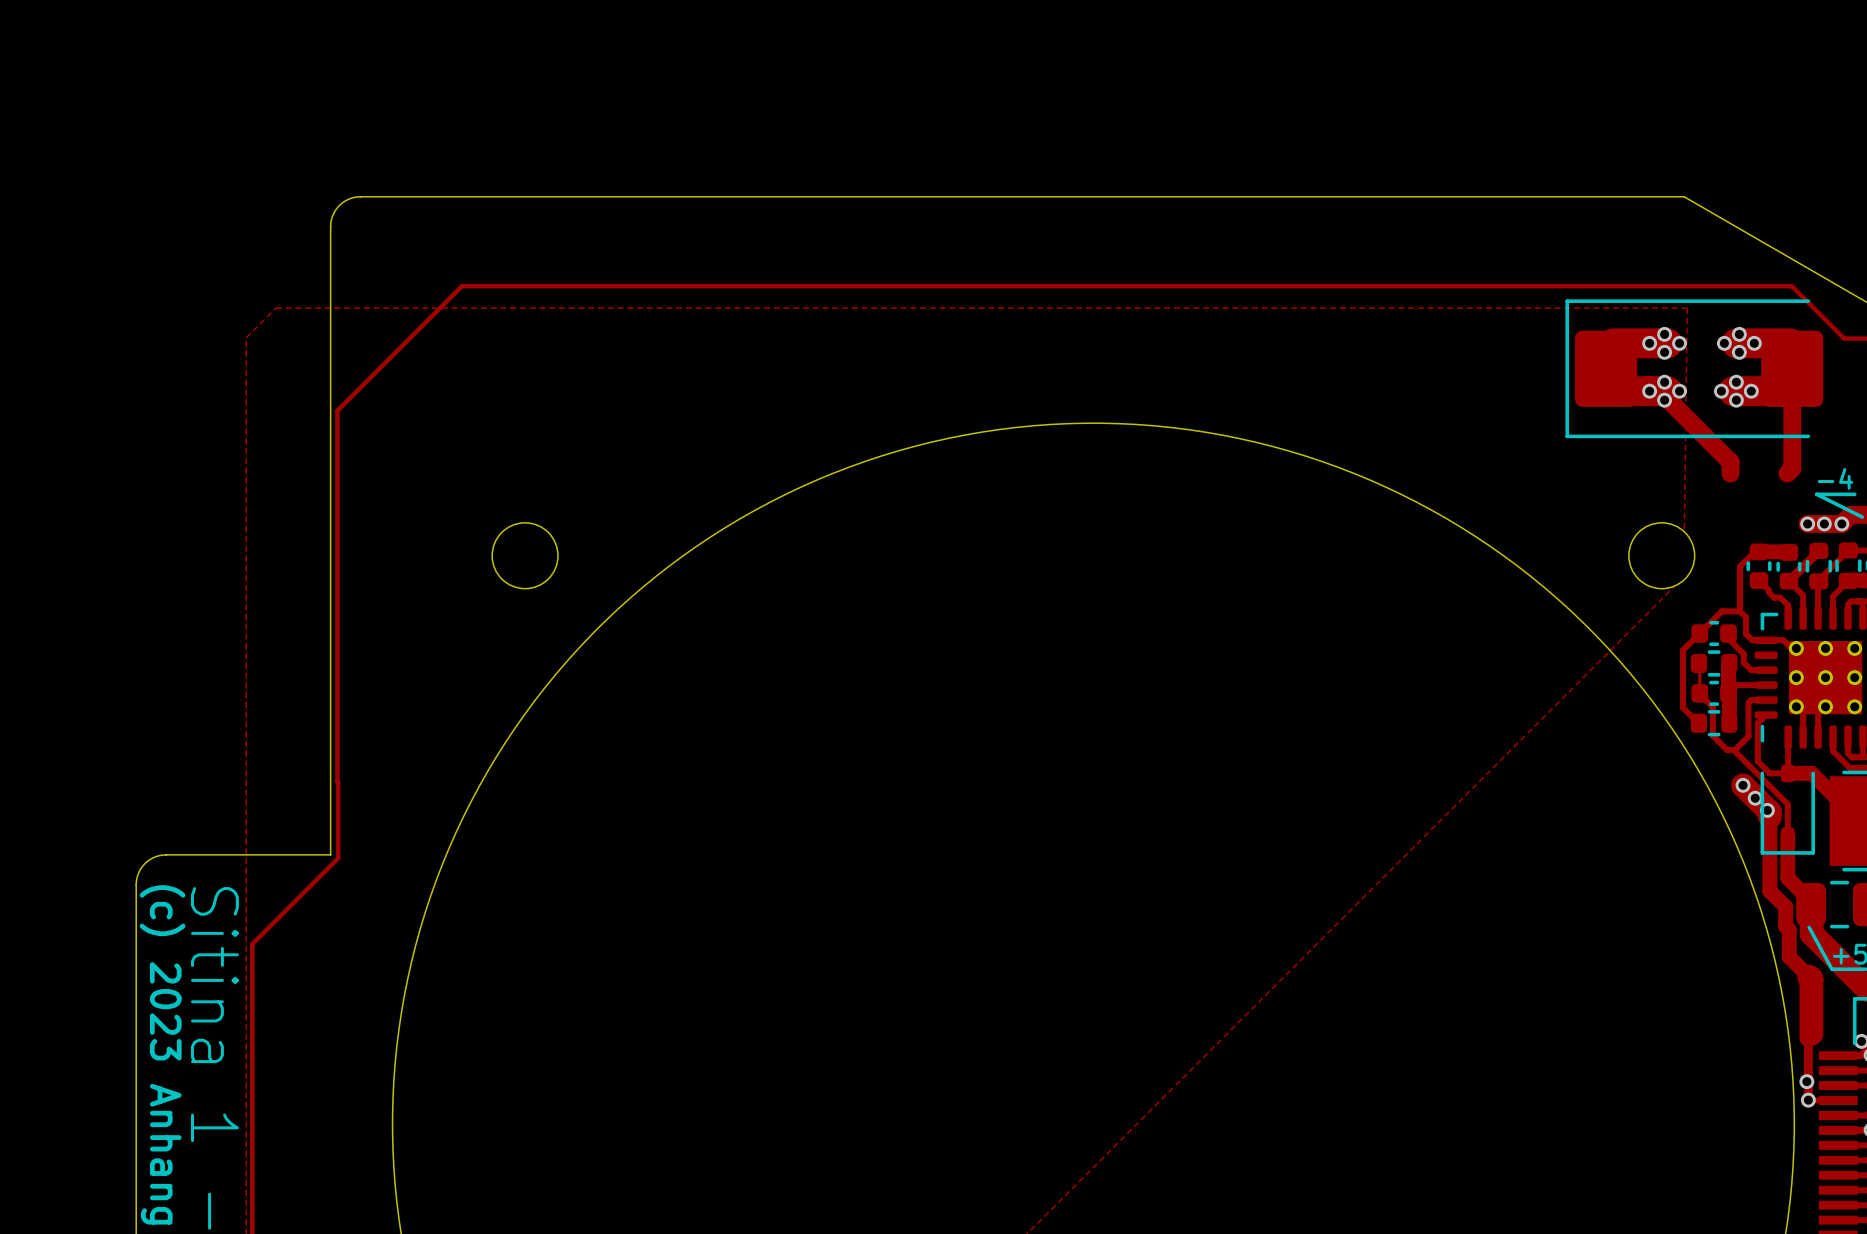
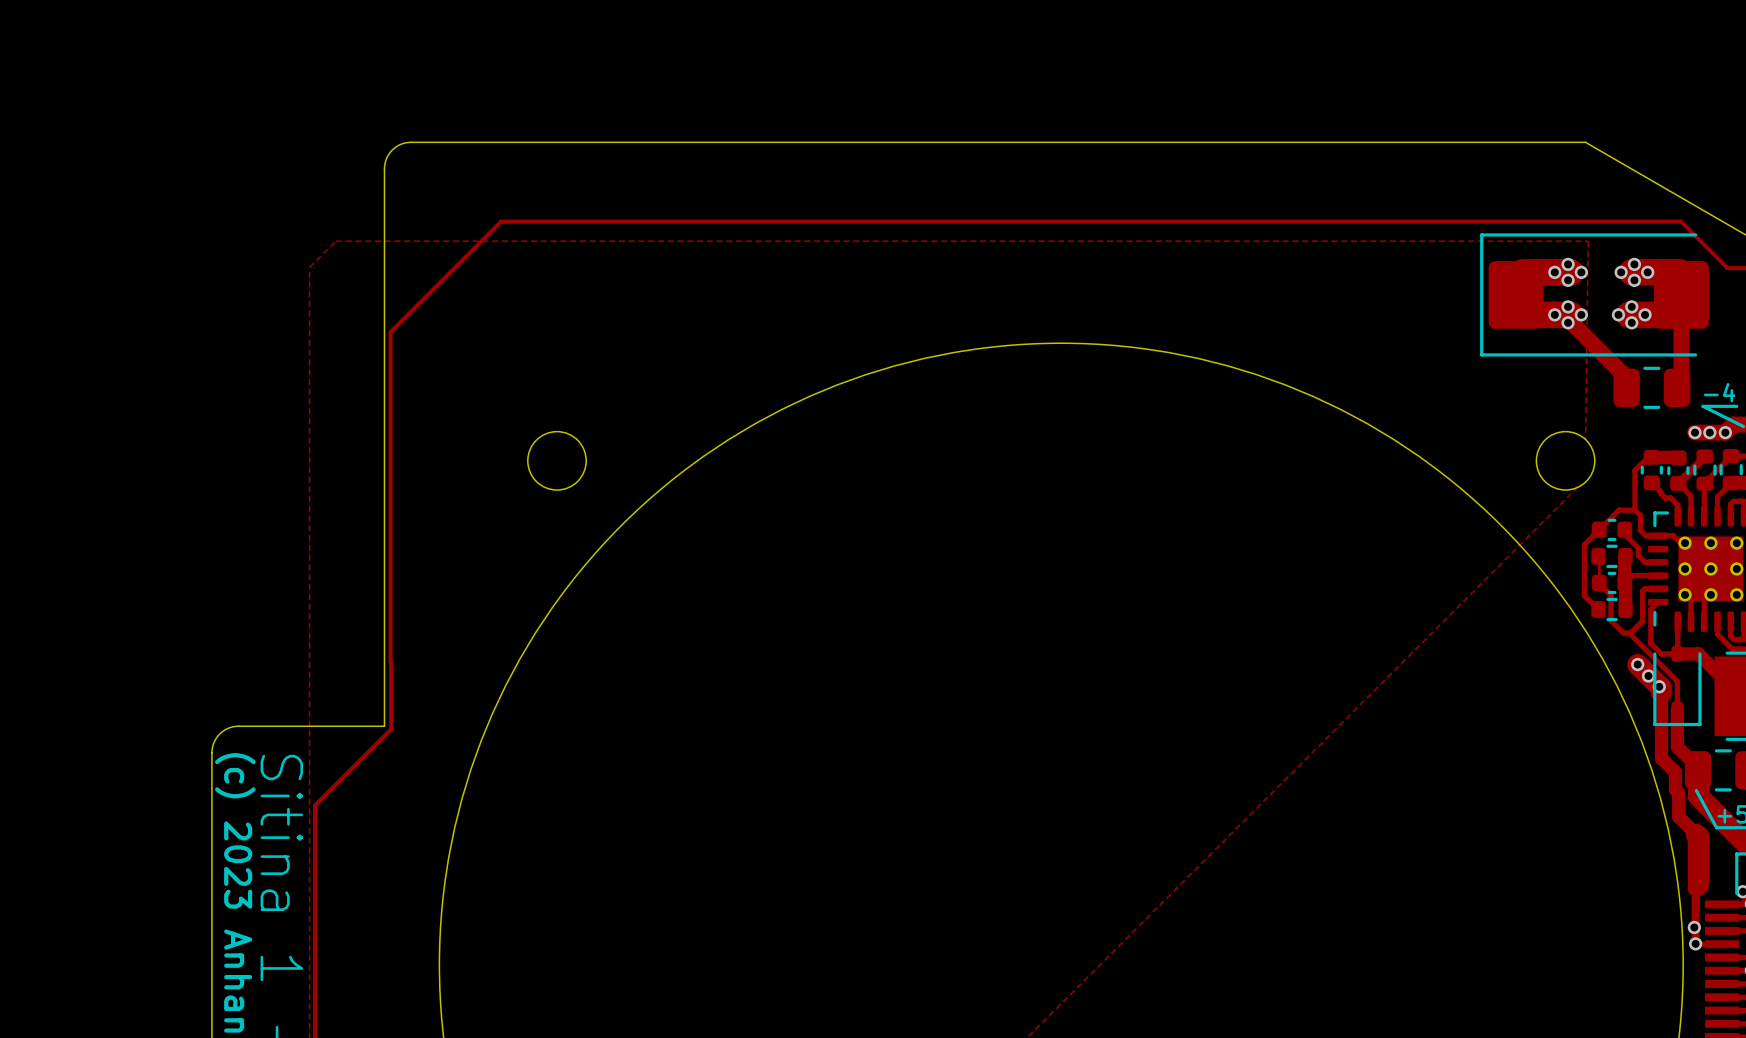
part: none -> (1651, 387)

